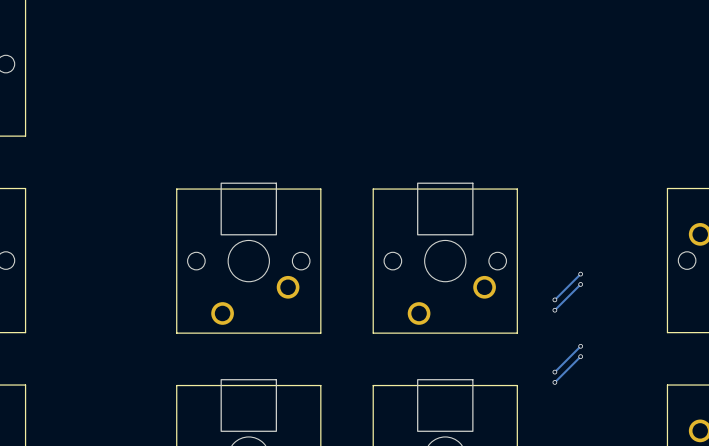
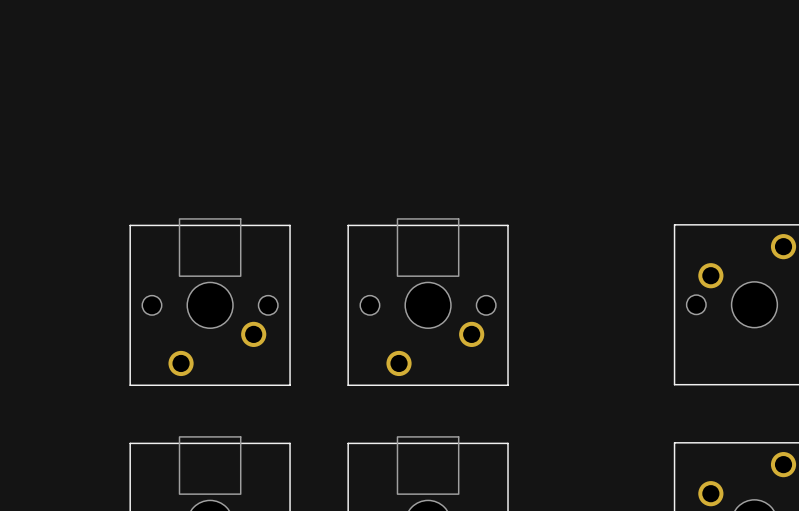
track: (580, 274) (554, 299) -> none
via: (580, 274) -> none
track: (580, 284) (554, 310) -> none
via: (580, 284) -> none
via: (554, 299) -> none
via: (554, 310) -> none
track: (580, 346) (554, 372) -> none
via: (580, 346) -> none
track: (580, 356) (554, 382) -> none
via: (580, 356) -> none
via: (554, 372) -> none
via: (554, 382) -> none

